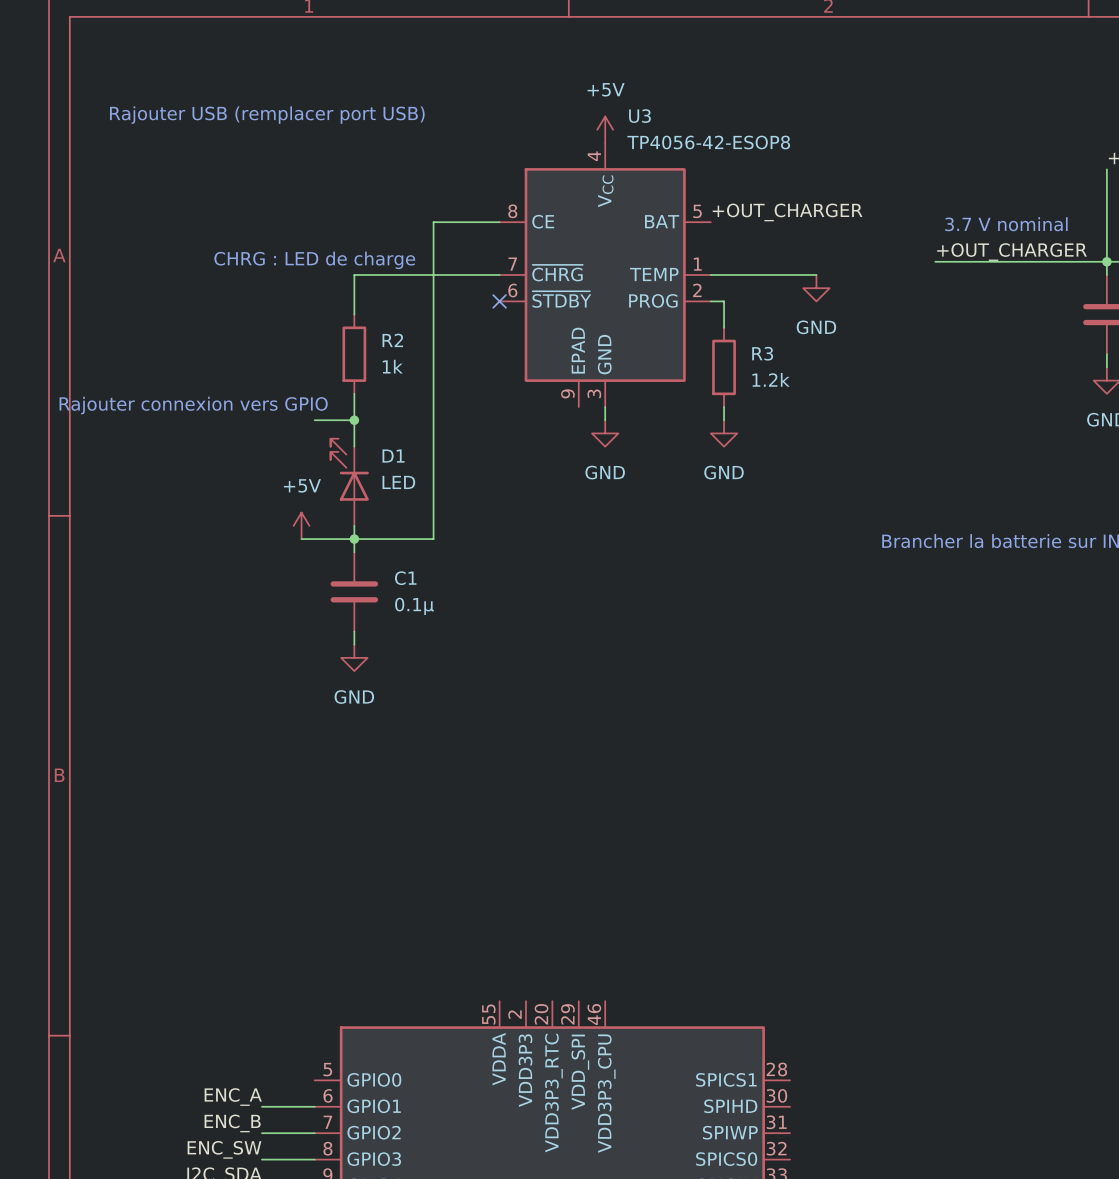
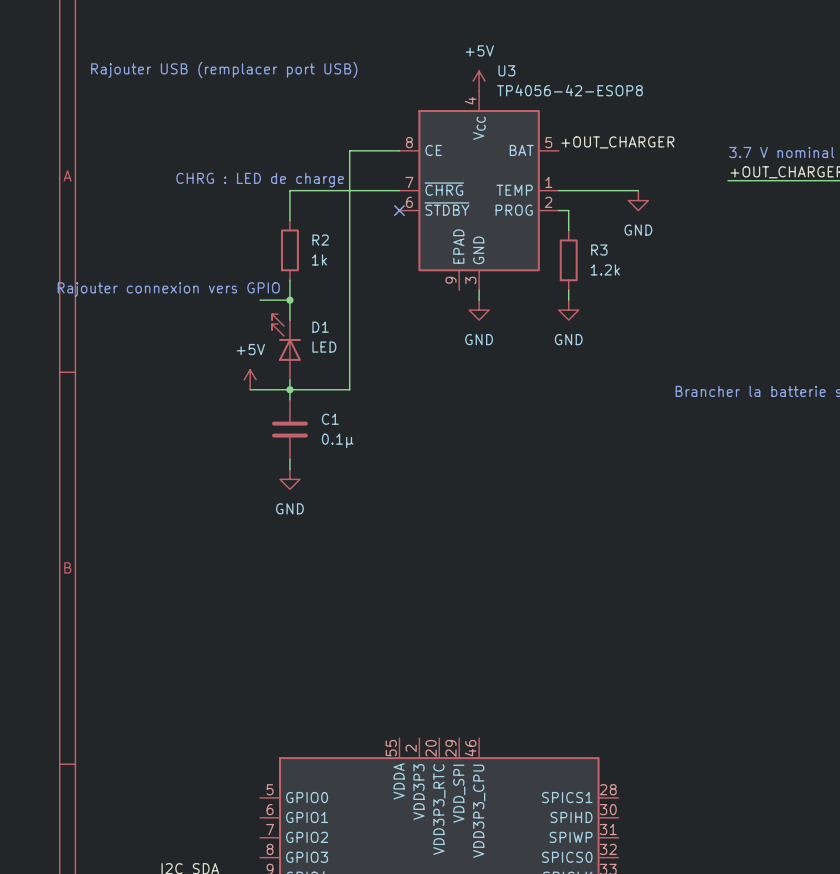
label: ENC_A (233, 1097) -> none
wire: (261, 1106) (314, 1106) -> none
label: ENC_B (232, 1123) -> none
wire: (261, 1133) (314, 1133) -> none
label: ENC_SW (224, 1149) -> none
wire: (261, 1159) (314, 1159) -> none

